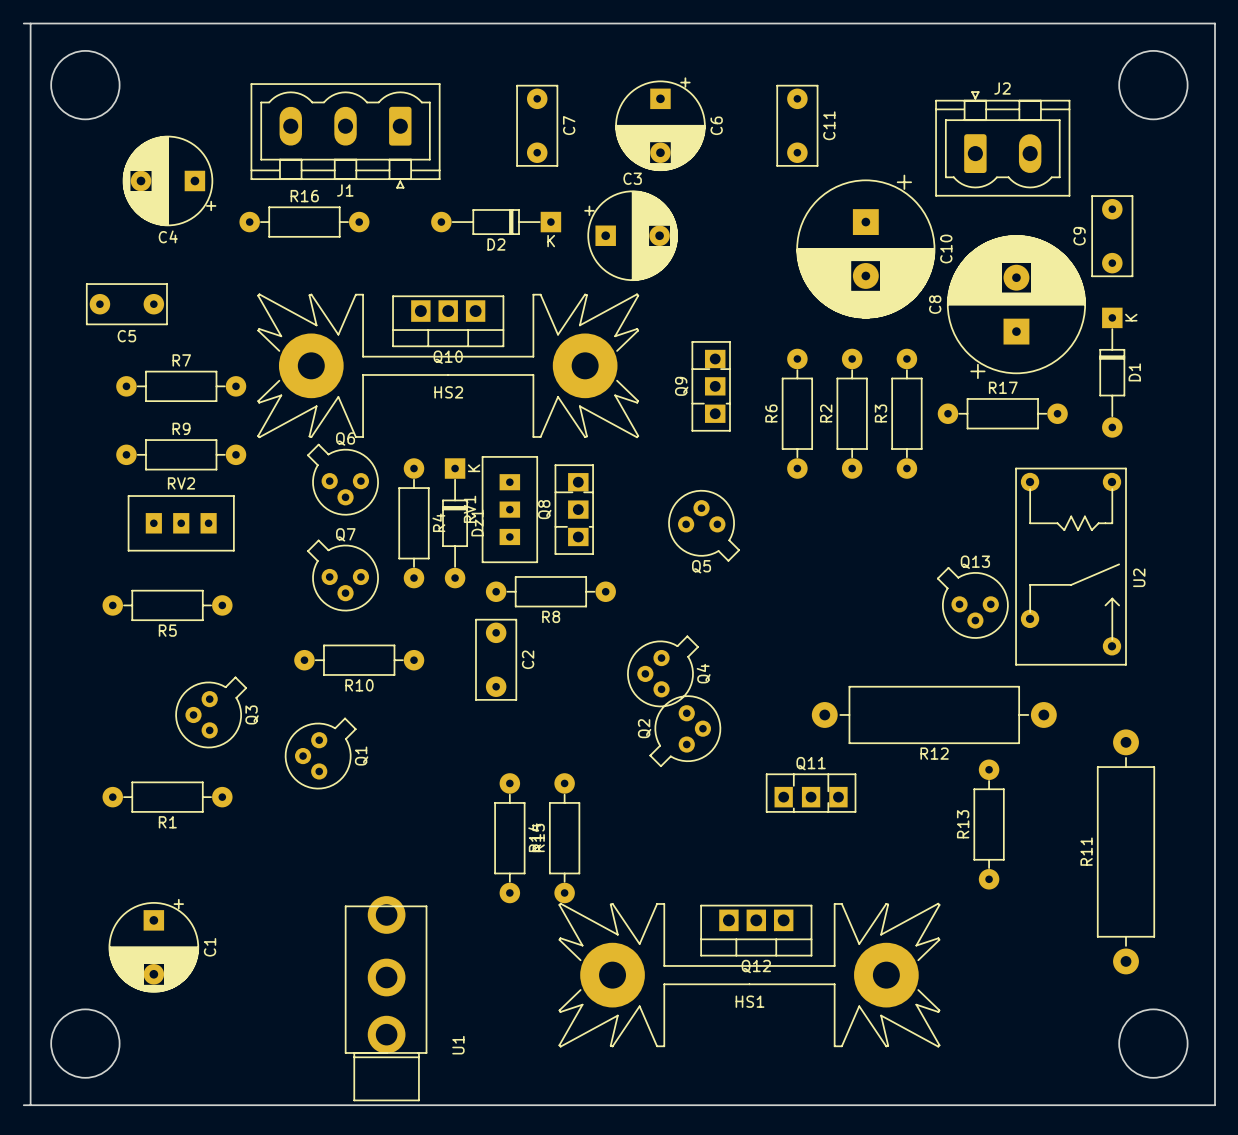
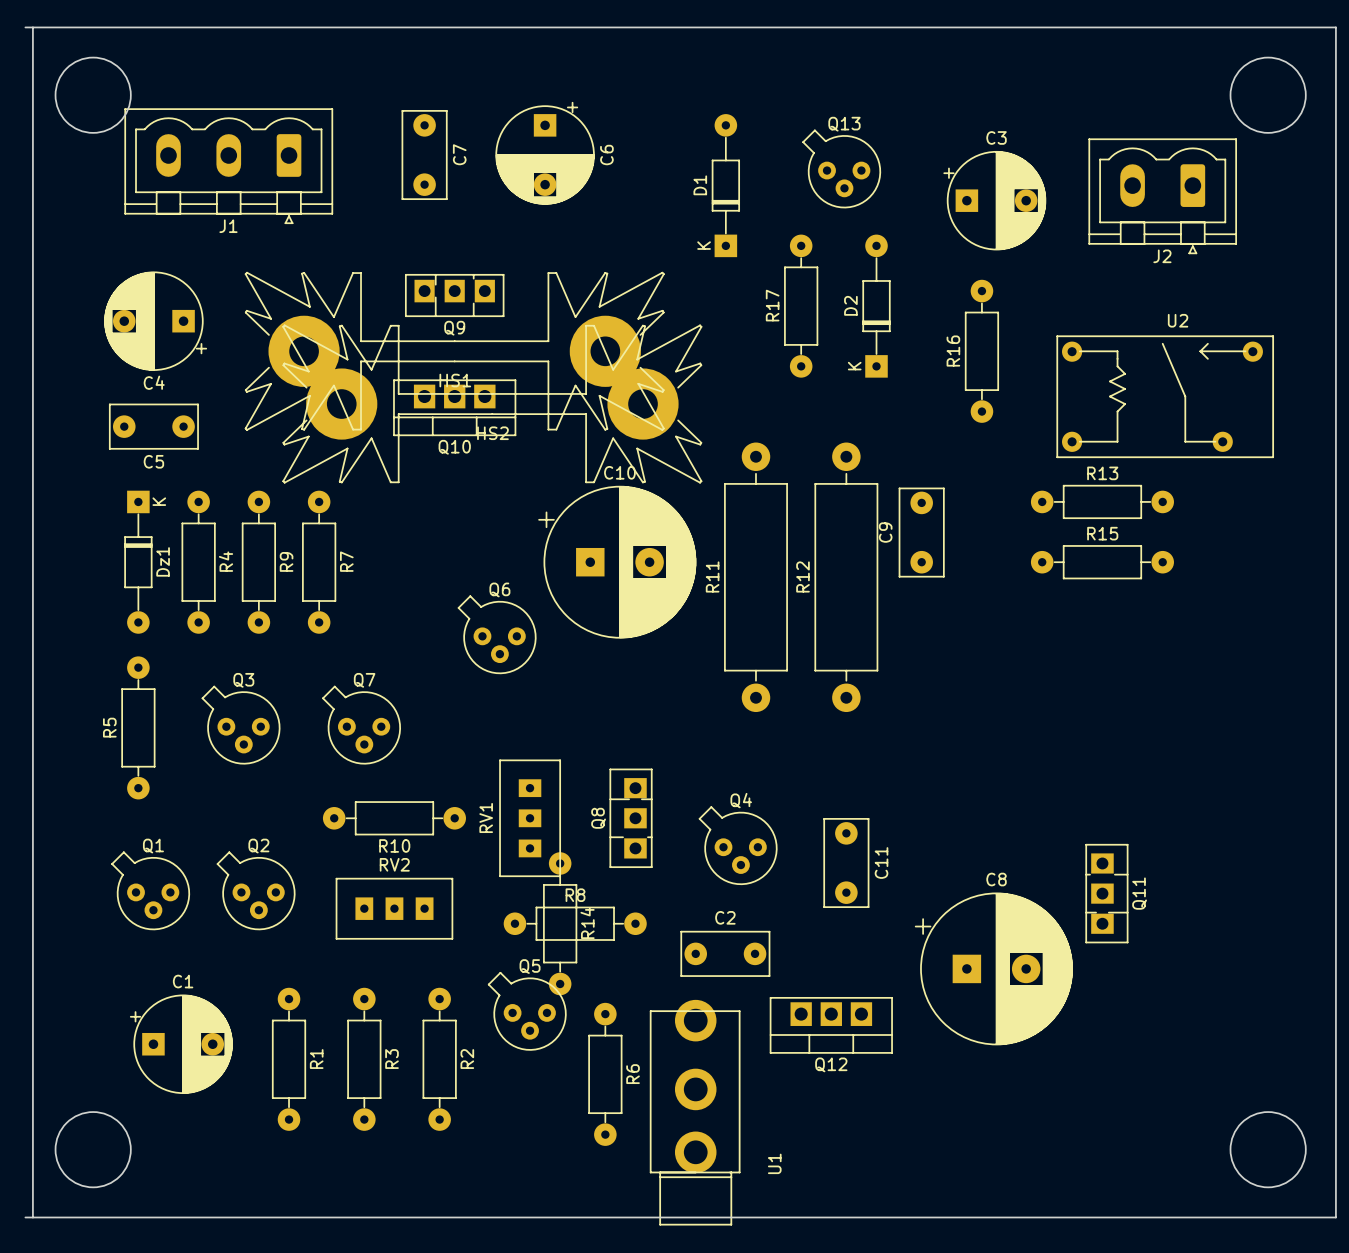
C6 position: (660, 124) -> (545, 153)
C7 position: (537, 125) -> (424, 155)
C11 position: (797, 125) -> (846, 863)
J1 position: (345, 135) -> (228, 166)
J2 rotation: 0° (1002, 143) -> 180° (1162, 196)
C4 position: (169, 180) -> (155, 321)
R16 name position: R16 (304, 196) -> R16 (953, 351)
R16 rotation: 0° (304, 222) -> 90° clockwise (981, 351)
R16 position: (304, 222) -> (981, 351)
D2 rotation: 0° (496, 222) -> 90° clockwise (876, 306)
D2 position: (496, 222) -> (876, 306)
C3 position: (631, 235) -> (994, 200)
C9 position: (1112, 236) -> (921, 532)
C10 rotation: 0° (865, 246) -> 90° counterclockwise (617, 562)
C10 position: (865, 246) -> (617, 562)
C5 position: (126, 304) -> (153, 426)
C8 rotation: 0° (1016, 307) -> 90° clockwise (993, 968)
C8 position: (1016, 307) -> (993, 968)
Q10 position: (448, 321) -> (454, 407)
D1 rotation: 0° (1112, 372) -> 180° (725, 185)
D1 position: (1112, 372) -> (725, 185)
R7 rotation: 0° (181, 386) -> 90° clockwise (319, 562)
R7 position: (181, 386) -> (319, 562)
Q9 rotation: 0° (711, 386) -> 90° counterclockwise (454, 295)
Q9 position: (711, 386) -> (454, 295)
R17 name position: R17 (1003, 387) -> R17 (772, 305)
R6 name position: R6 (771, 413) -> R6 (633, 1074)
R6 position: (797, 413) -> (605, 1074)
R2 name position: R2 (826, 413) -> R2 (467, 1059)
R2 position: (852, 413) -> (439, 1059)
R3 name position: R3 (880, 413) -> R3 (392, 1059)
R3 position: (906, 413) -> (364, 1059)
R17 rotation: 0° (1002, 413) -> 90° clockwise (801, 306)
R17 position: (1002, 413) -> (801, 306)
R9 rotation: 0° (181, 454) -> 90° clockwise (258, 562)
Q6 position: (343, 479) -> (497, 634)
RV1 position: (509, 509) -> (530, 818)
Q8 position: (574, 509) -> (631, 818)
RV2 position: (181, 523) -> (394, 908)
R4 position: (414, 523) -> (198, 562)
Dz1 position: (455, 523) -> (138, 562)
Q5 rotation: 0° (704, 525) -> 180° (527, 1011)
Q5 position: (704, 525) -> (527, 1011)
U2 rotation: 0° (1071, 566) -> 90° counterclockwise (1165, 396)
U2 position: (1071, 566) -> (1165, 396)
Q7 position: (343, 575) -> (361, 725)
R8 position: (550, 591) -> (575, 923)
Q13 position: (972, 602) -> (841, 168)
R5 rotation: 0° (167, 605) -> 90° clockwise (138, 727)
R8 name position: R8 (551, 616) -> R8 (575, 895)
C2 rotation: 0° (496, 659) -> 90° clockwise (725, 953)
C2 position: (496, 659) -> (725, 953)
C2 name position: C2 (528, 659) -> C2 (725, 917)
R10 position: (359, 660) -> (394, 818)
Q4 rotation: 0° (662, 671) -> 90° counterclockwise (738, 845)
Q4 position: (662, 671) -> (738, 845)
Q3 rotation: 0° (211, 712) -> 90° counterclockwise (241, 725)
Q3 position: (211, 712) -> (241, 725)
R12 rotation: 0° (934, 714) -> 90° clockwise (846, 577)
R12 position: (934, 714) -> (846, 577)
Q2 rotation: 0° (685, 731) -> 90° clockwise (256, 890)
Q2 position: (685, 731) -> (256, 890)
Q1 rotation: 0° (320, 753) -> 90° counterclockwise (150, 890)
Q1 position: (320, 753) -> (150, 890)
Q11 rotation: 0° (811, 793) -> 90° clockwise (1106, 893)
Q11 position: (811, 793) -> (1106, 893)
R1 rotation: 0° (167, 797) -> 90° clockwise (289, 1059)
R1 position: (167, 797) -> (289, 1059)
R1 name position: R1 (167, 822) -> R1 (316, 1059)
R13 rotation: 0° (989, 824) -> 90° clockwise (1102, 501)
R13 position: (989, 824) -> (1102, 501)
R15 rotation: 0° (564, 838) -> 90° clockwise (1102, 562)
R15 position: (564, 838) -> (1102, 562)
R11 position: (1126, 851) -> (755, 577)
C1 rotation: 0° (153, 945) -> 90° counterclockwise (181, 1044)
HS1 position: (749, 975) -> (454, 351)
U1 position: (386, 998) -> (695, 1112)

